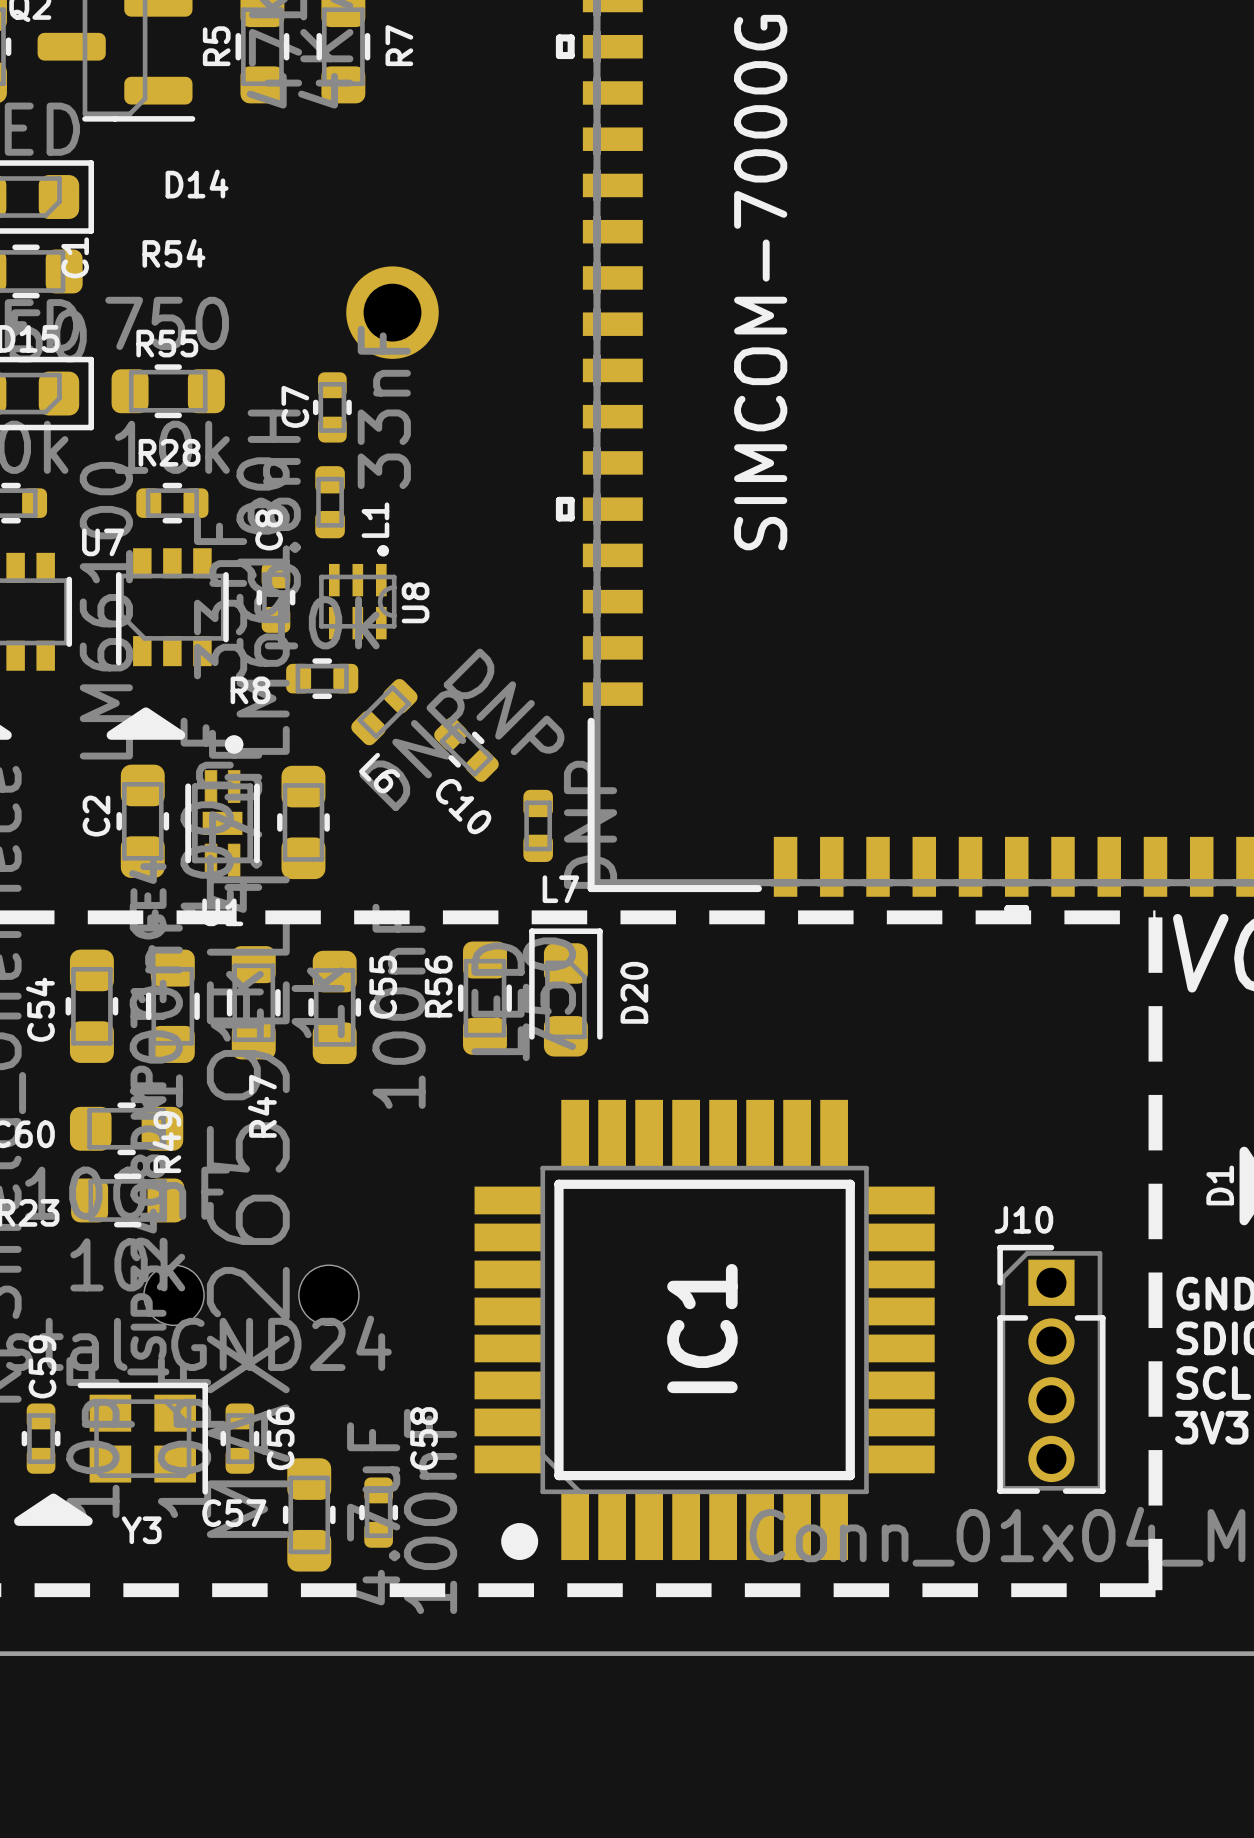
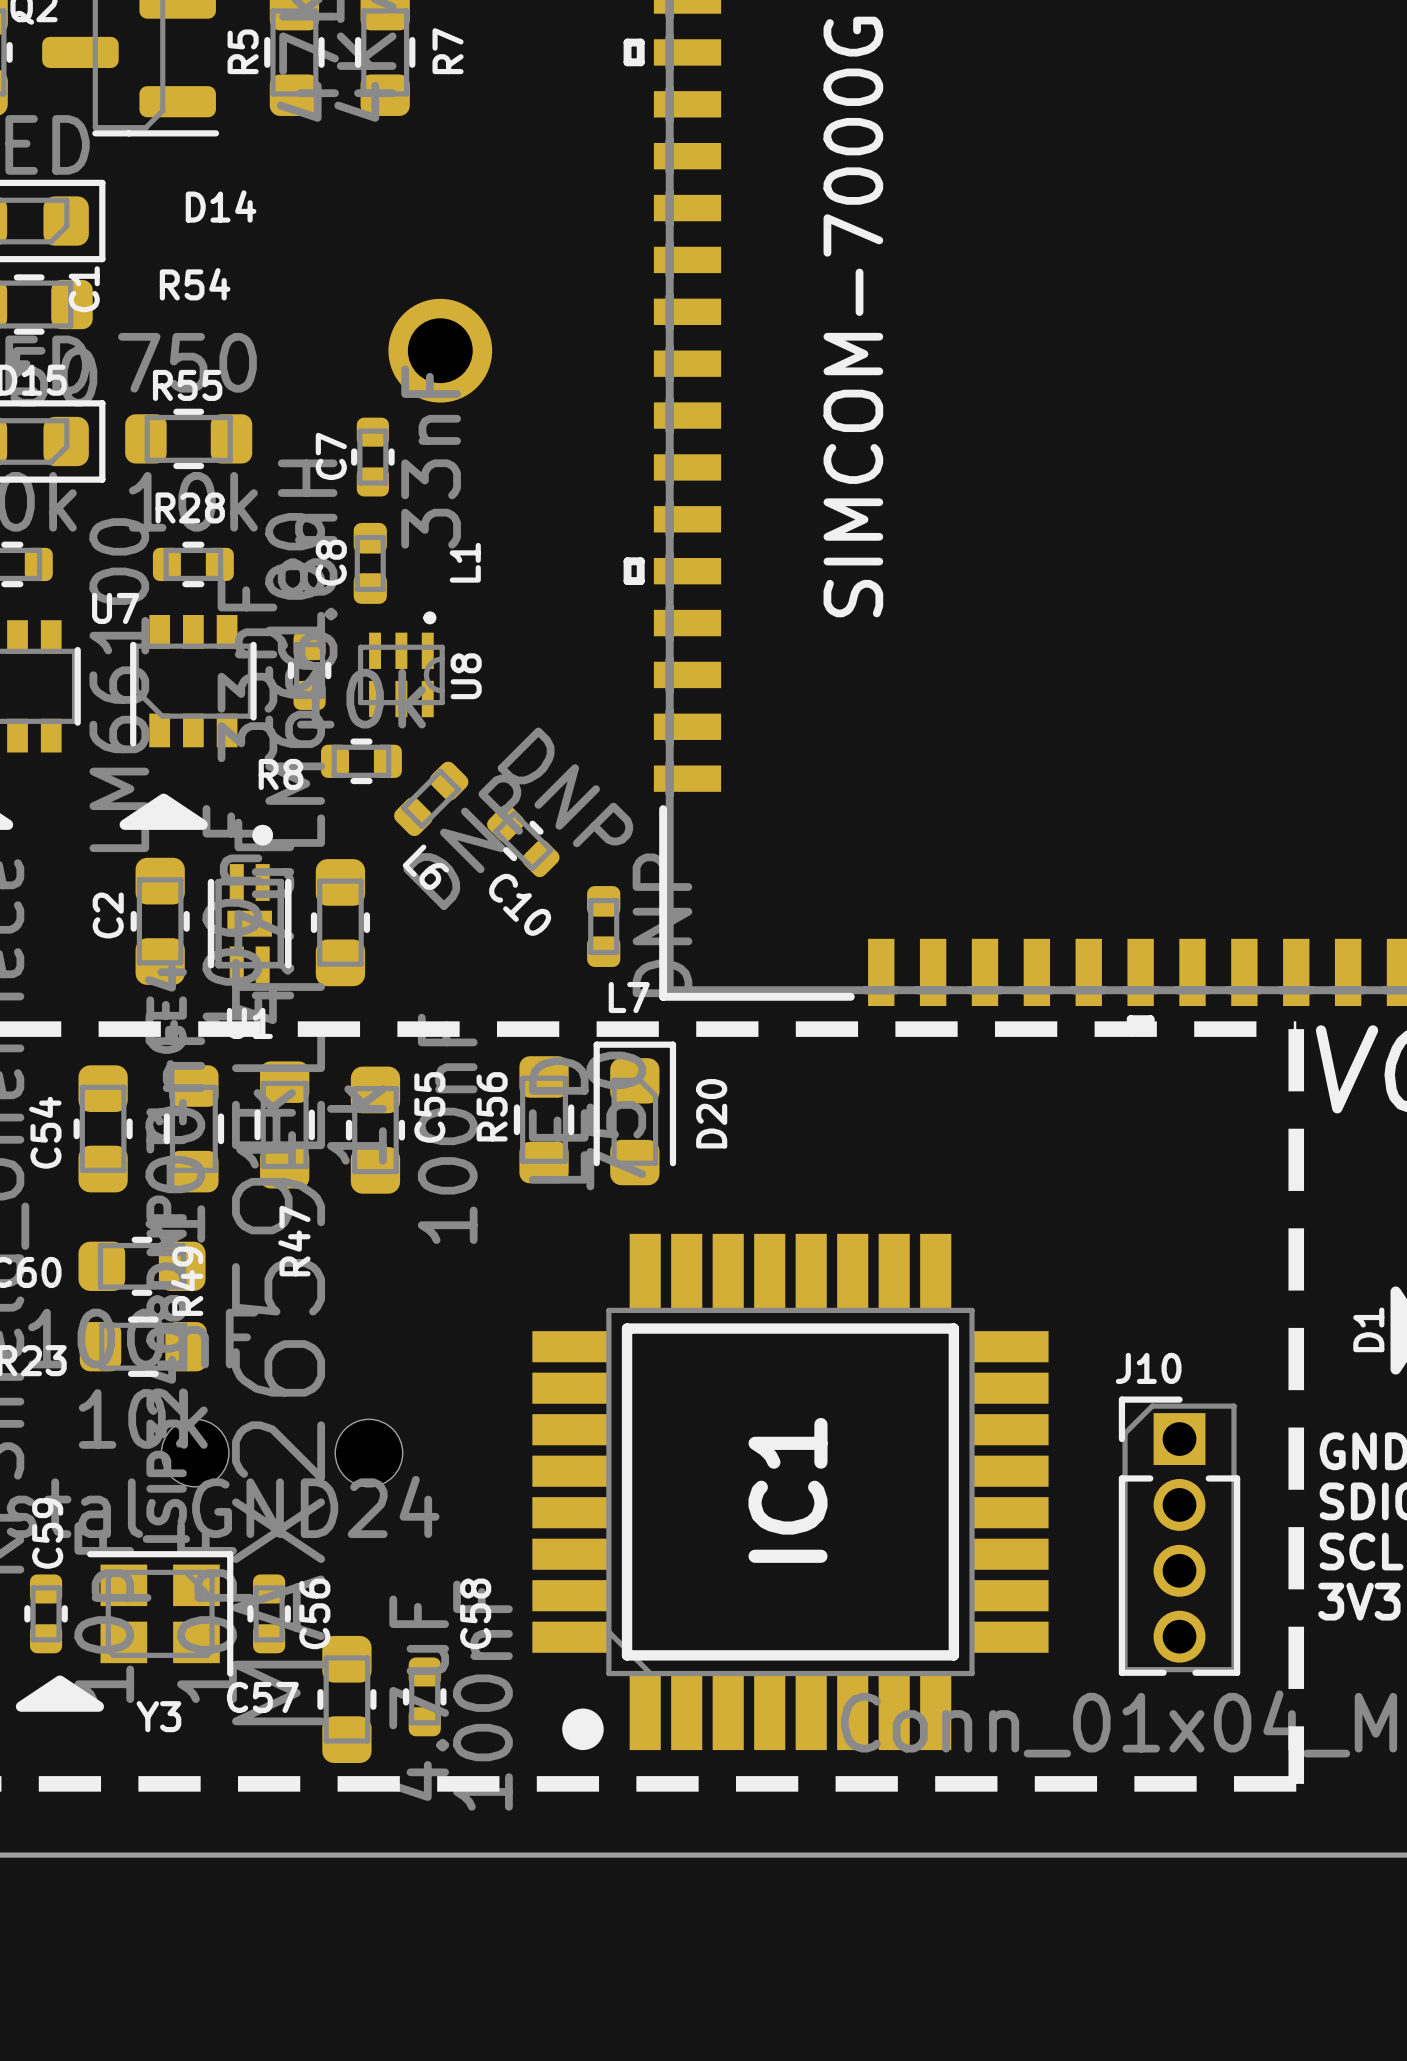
L1 name position: L1 (375, 520) -> L1 (465, 562)
C8 name position: C8 (269, 529) -> C8 (331, 562)

